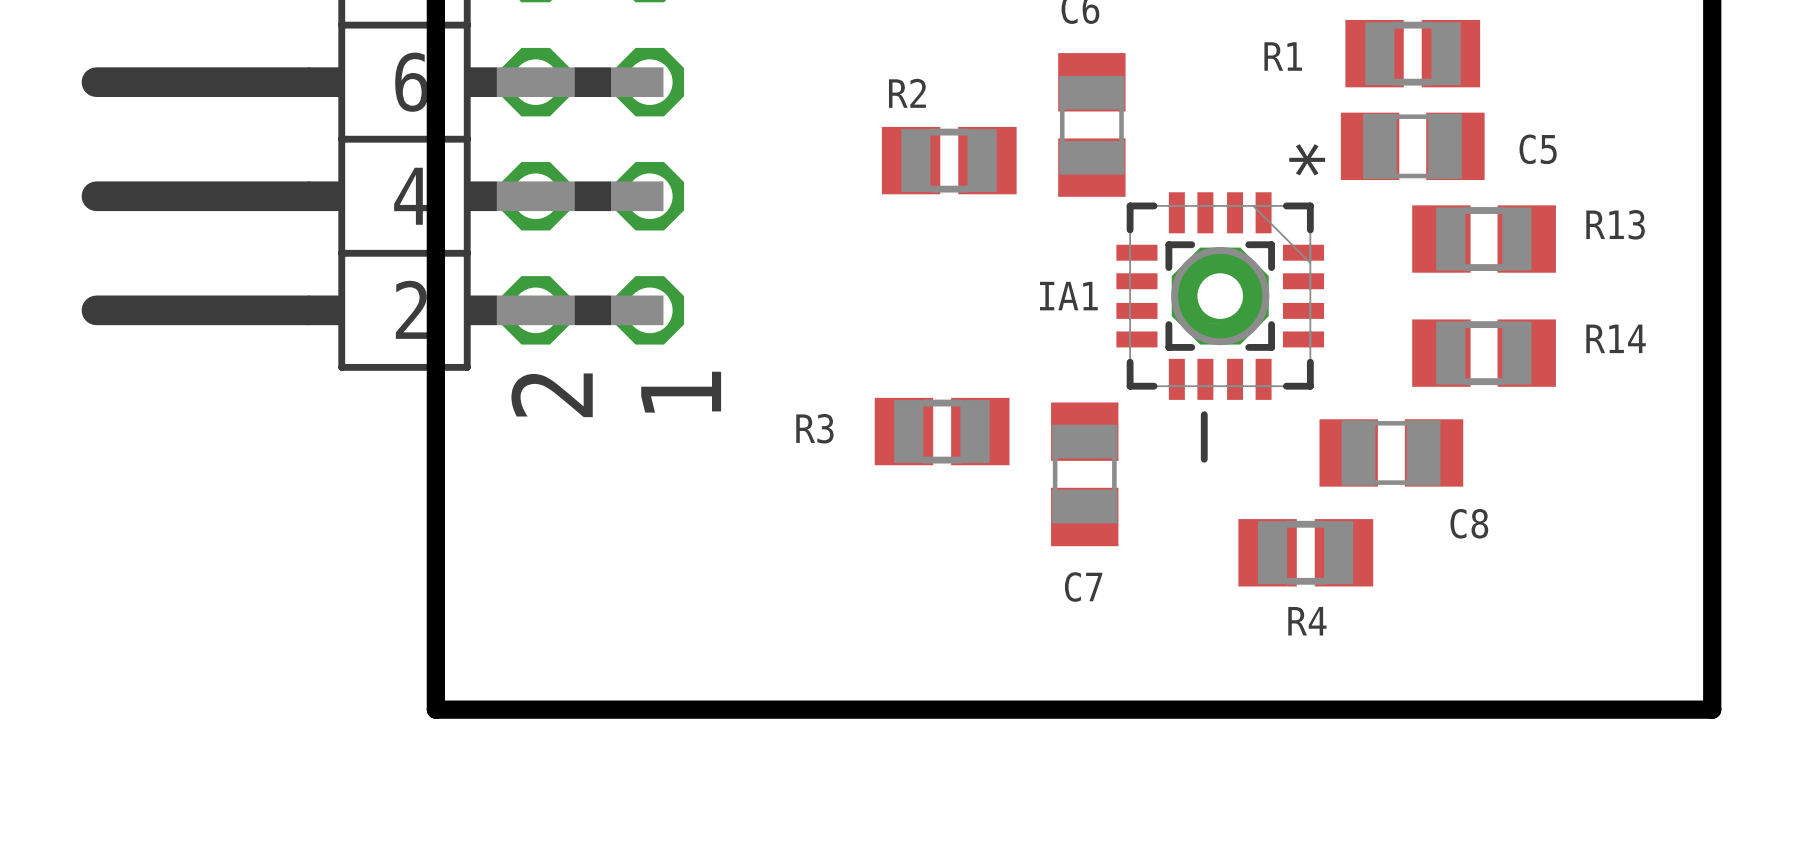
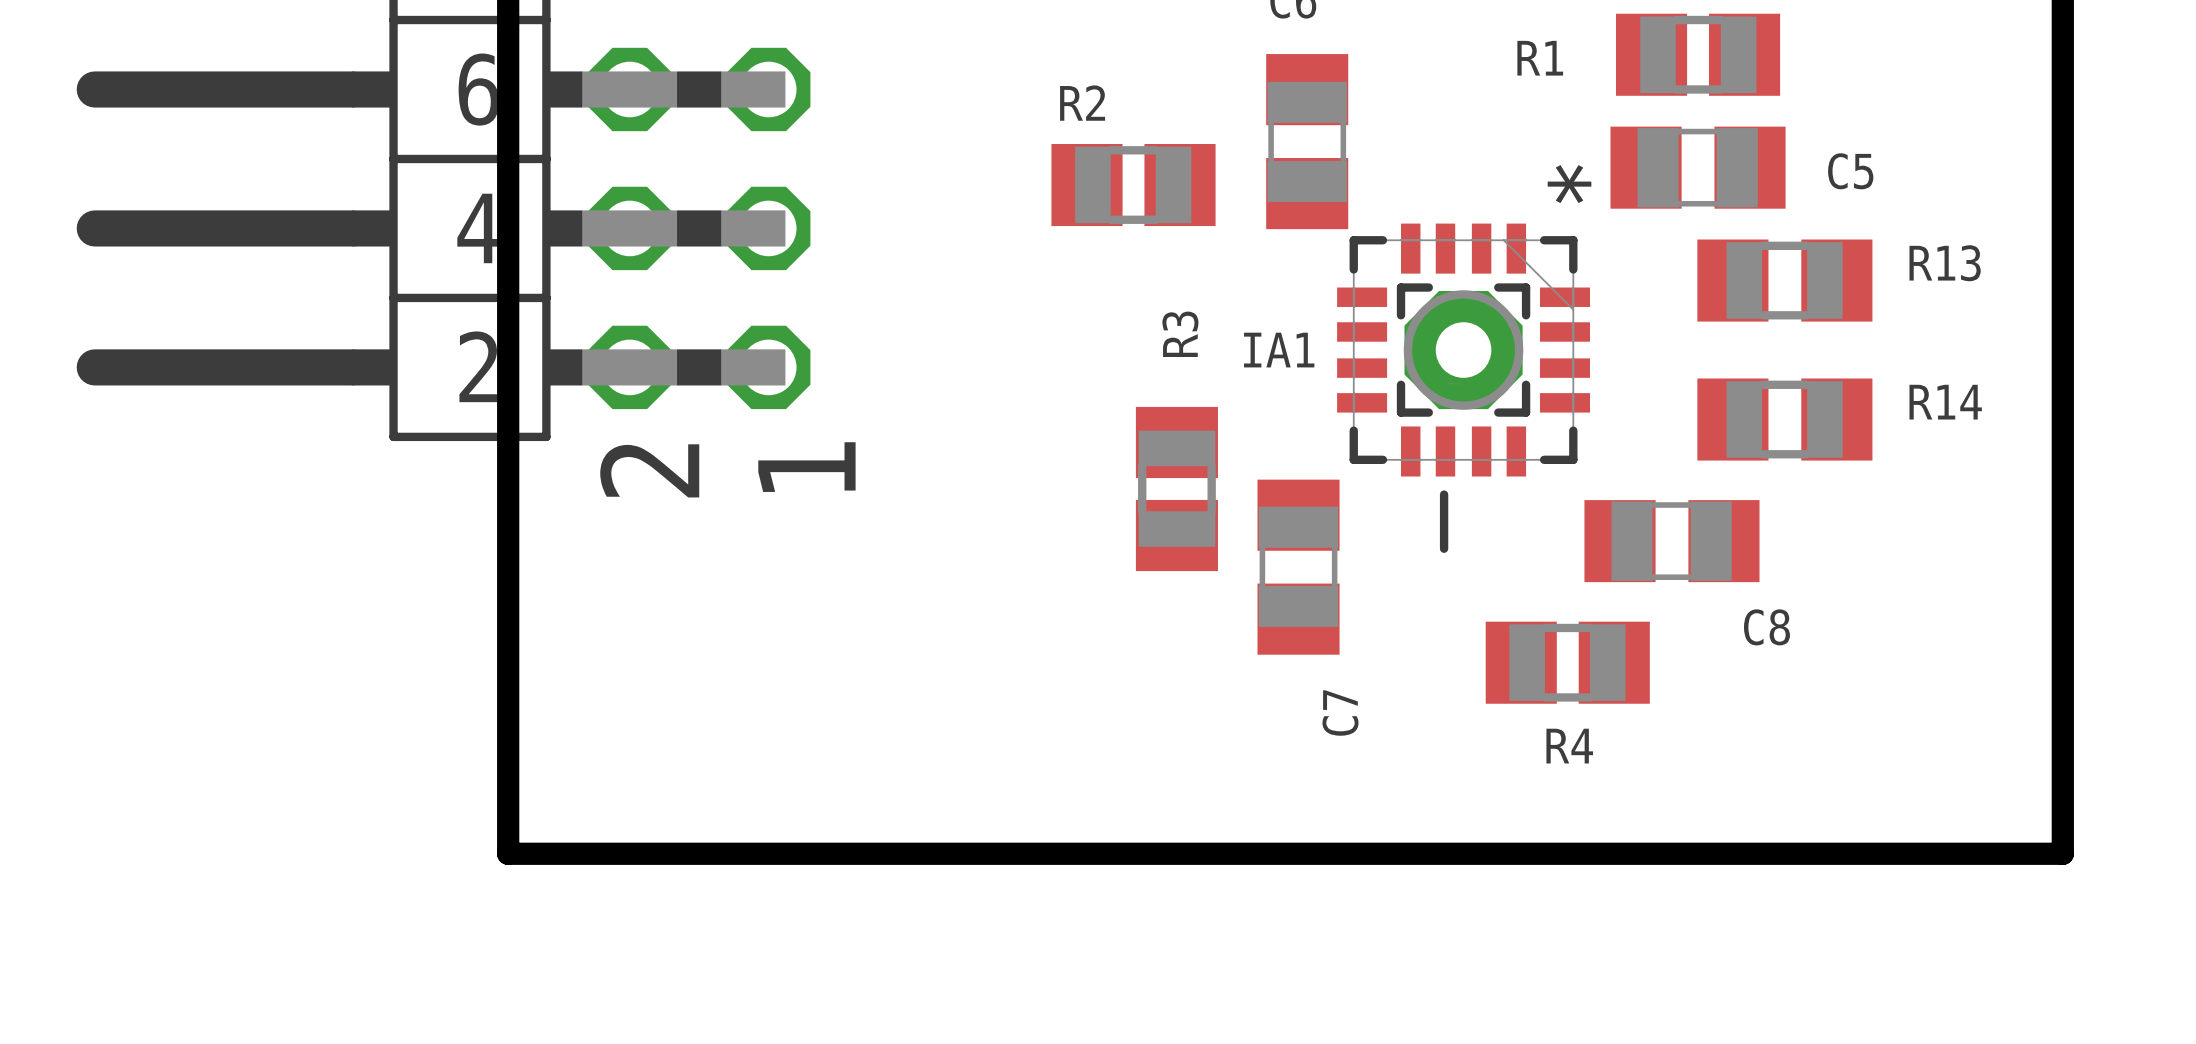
R3 rotation: 0° (942, 431) -> 90° clockwise (1176, 489)
C7 name rotation: 0° (1083, 587) -> 90° counterclockwise (1340, 712)

